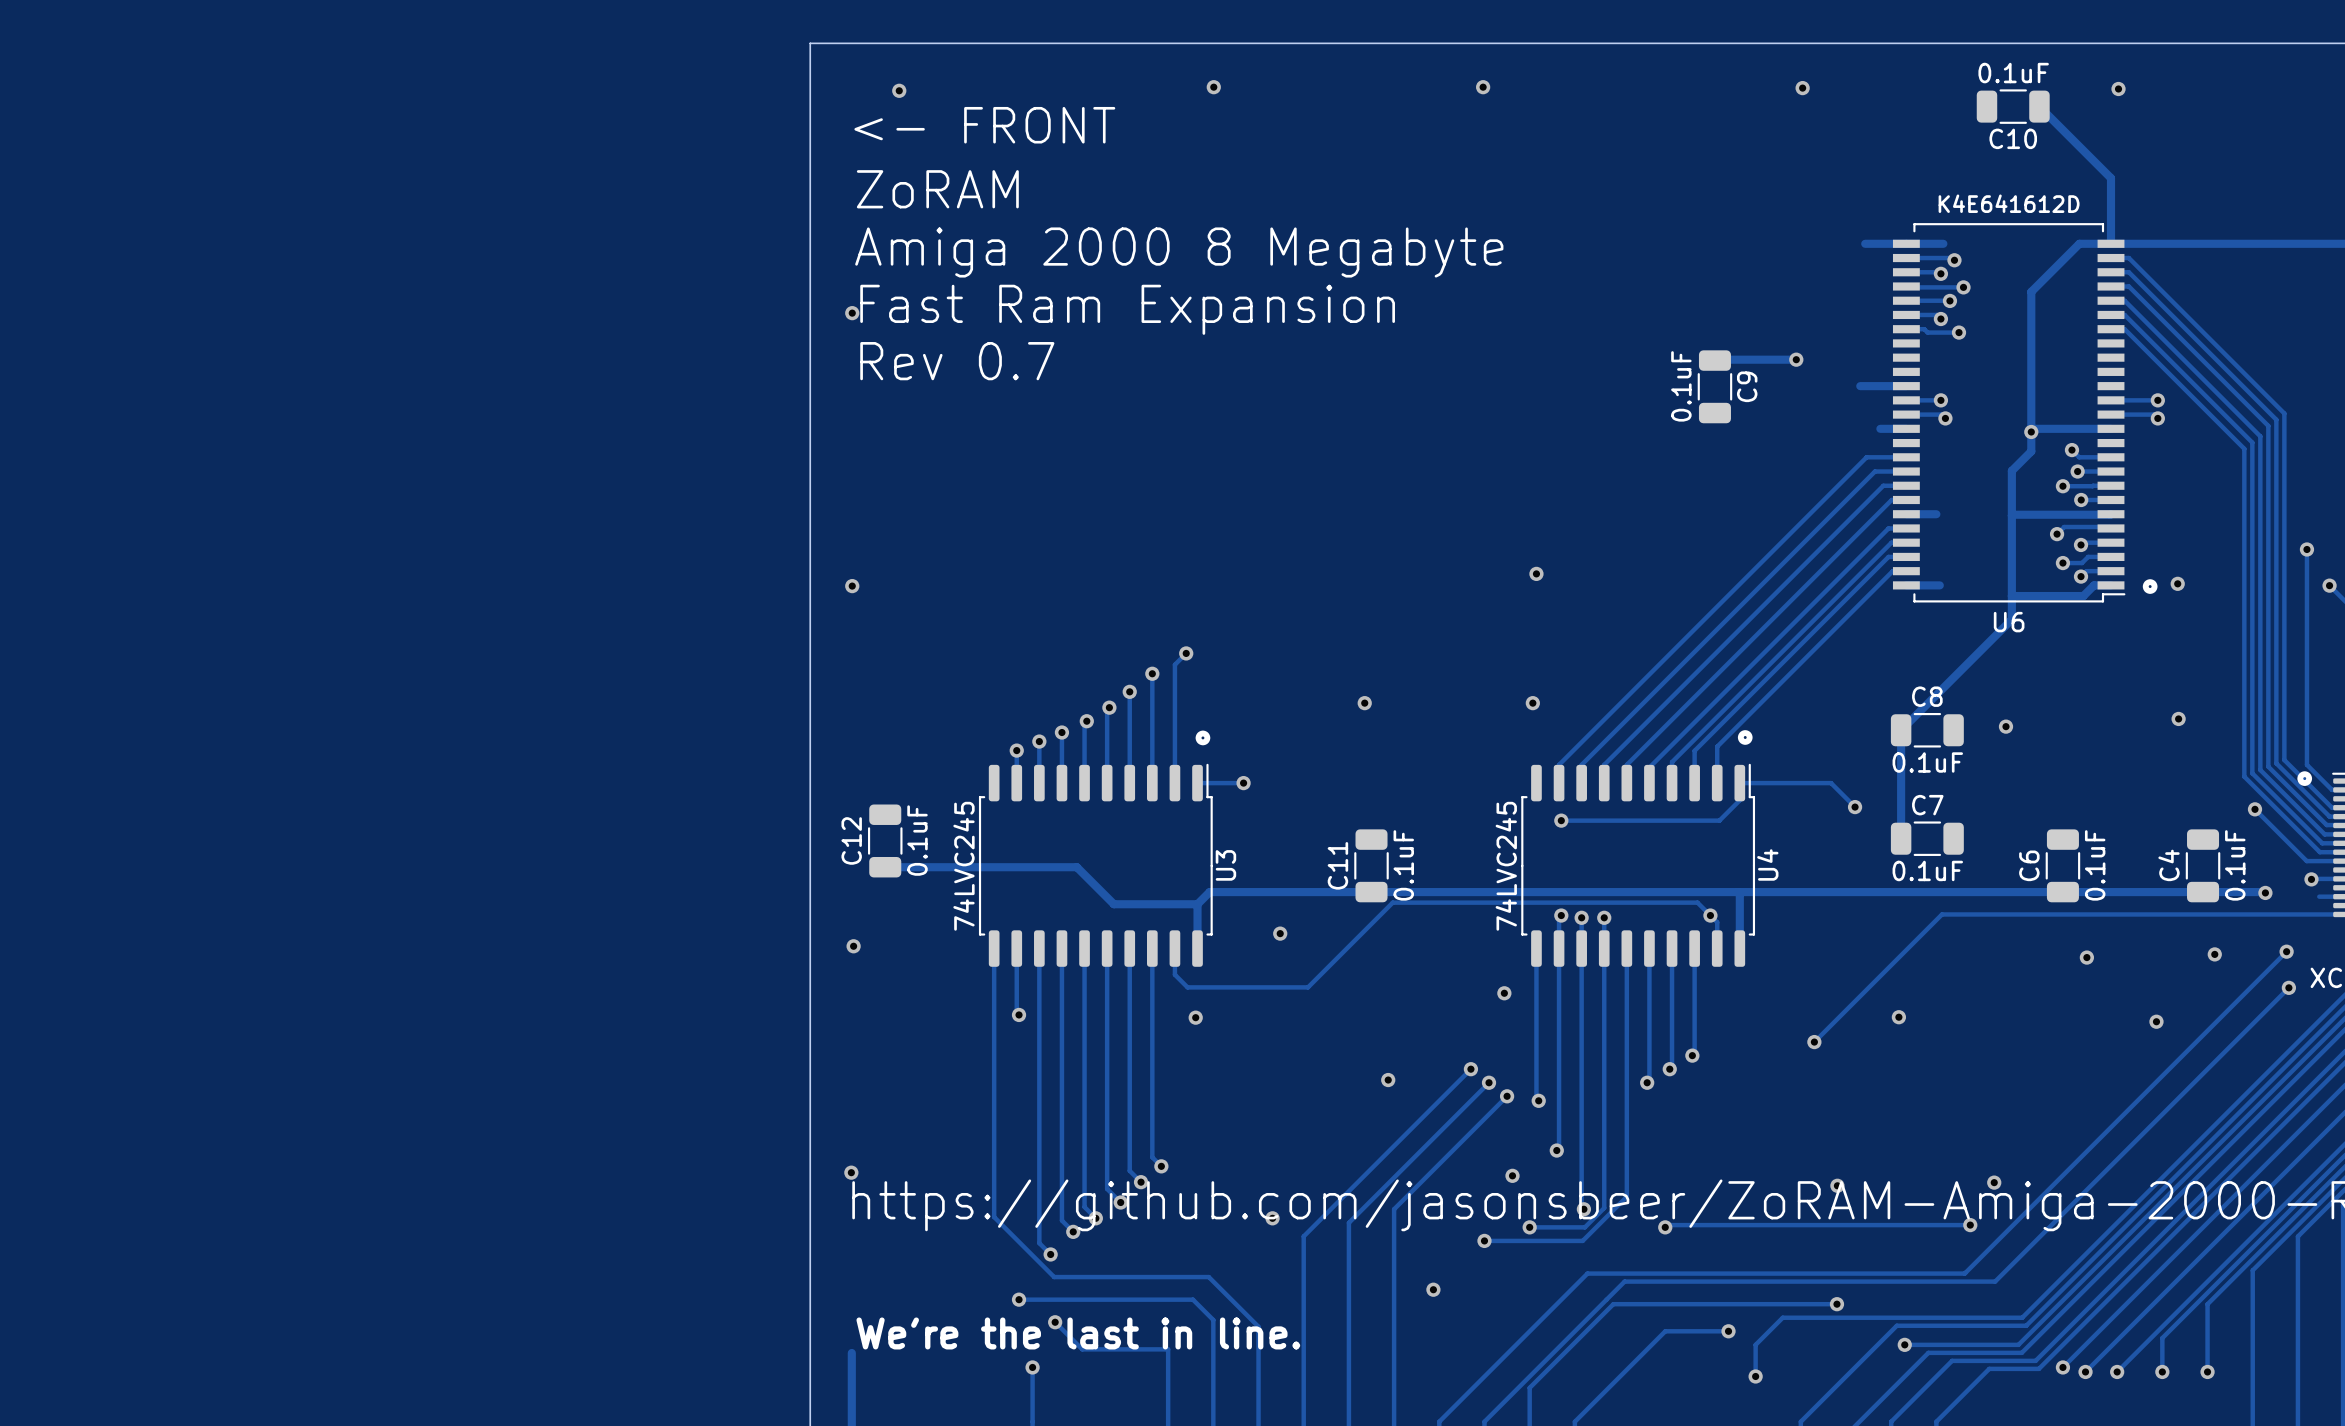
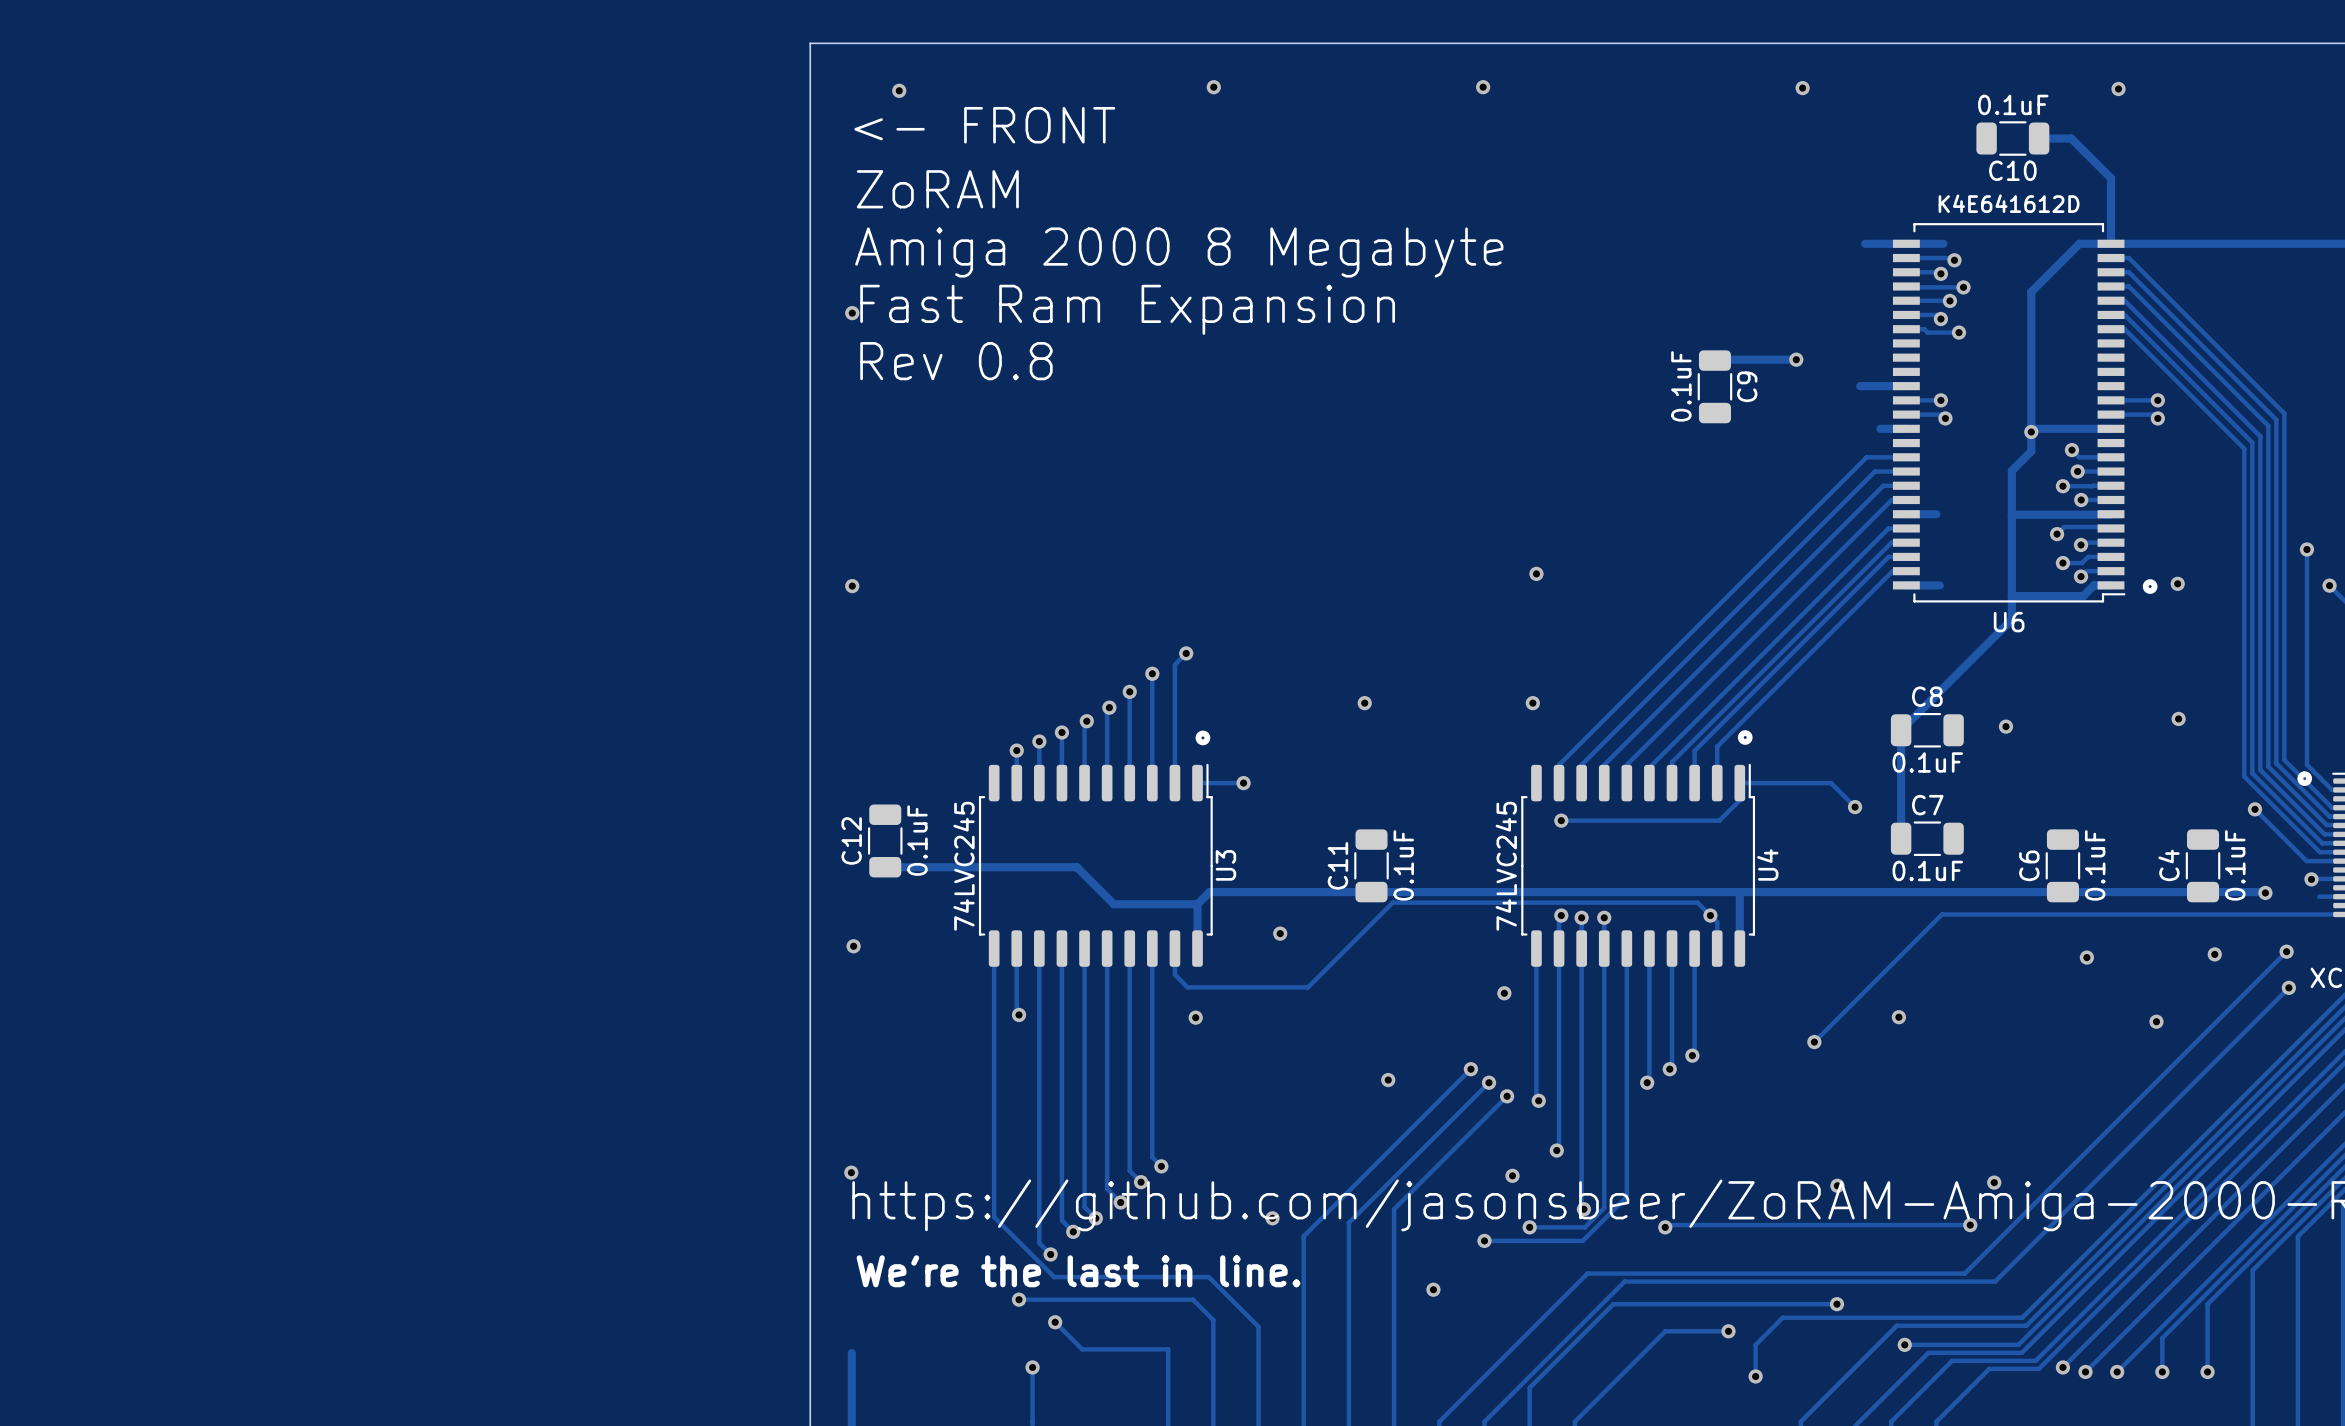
C10 position: (2013, 106) -> (2012, 138)
track: (2039, 106) (2071, 138) -> (2039, 138) (2071, 138)
text: Rev 0.7 (957, 361) -> Rev 0.8 (956, 361)
text position: We're the last in line. (1078, 1333) -> We're the last in line. (1078, 1271)

